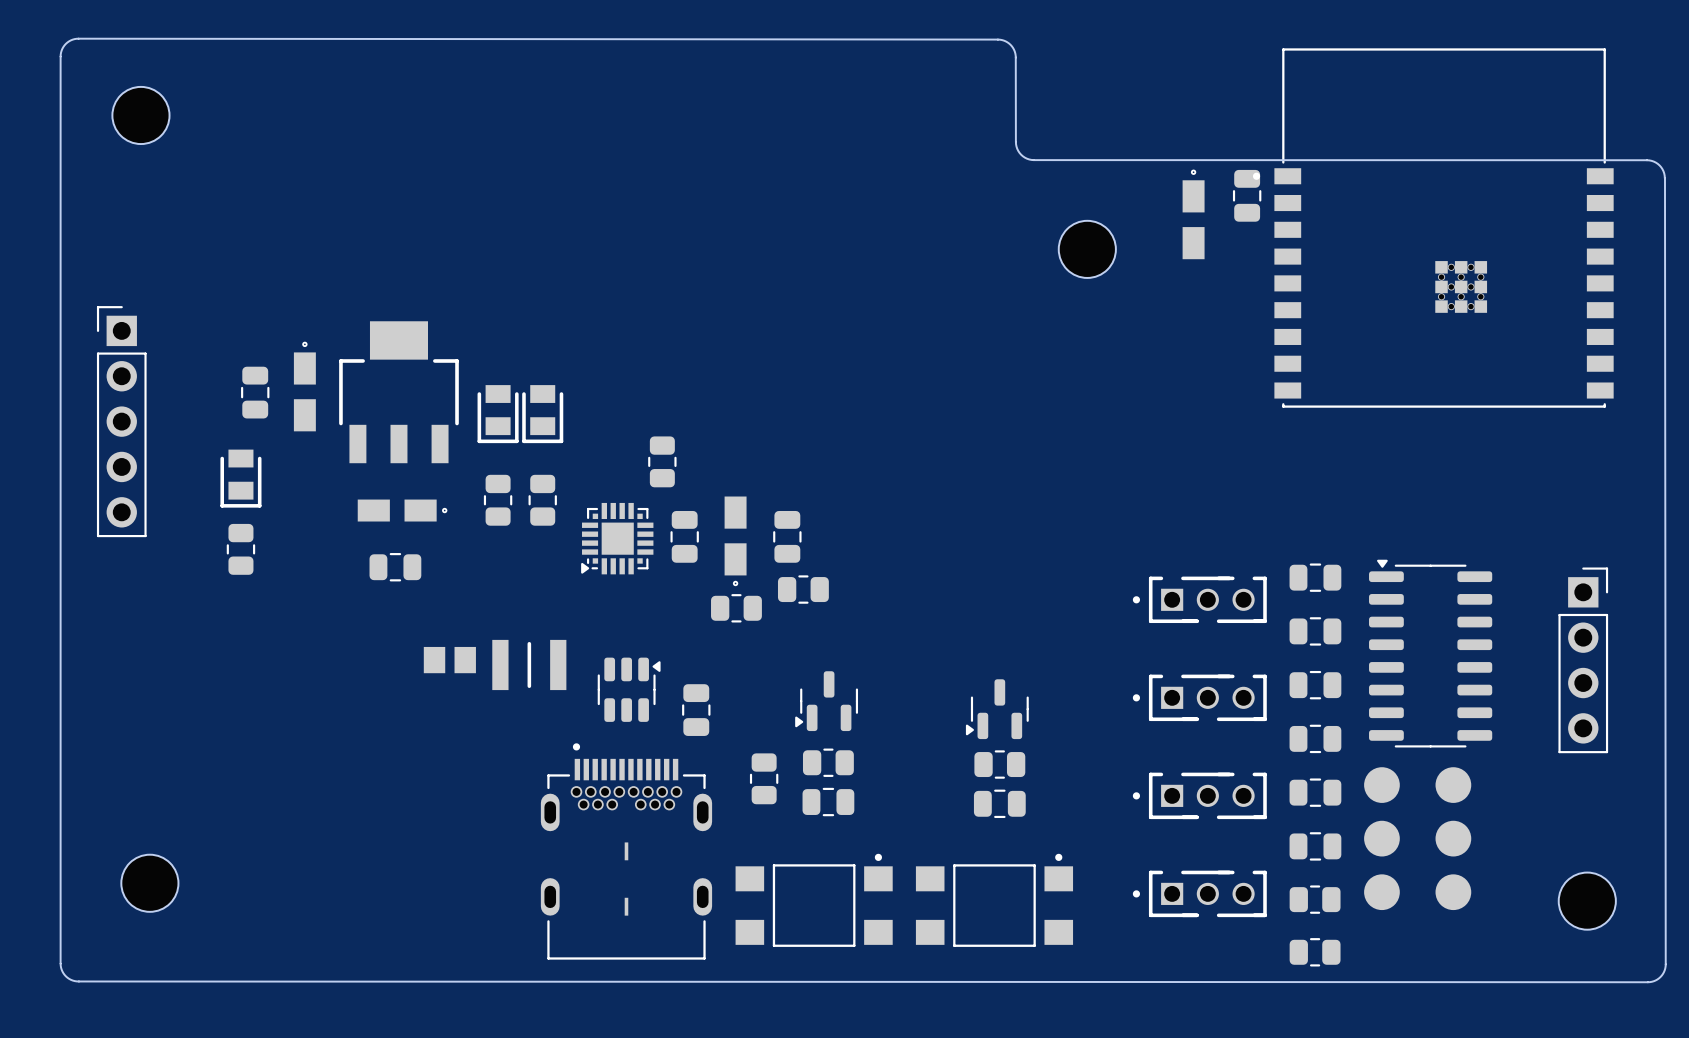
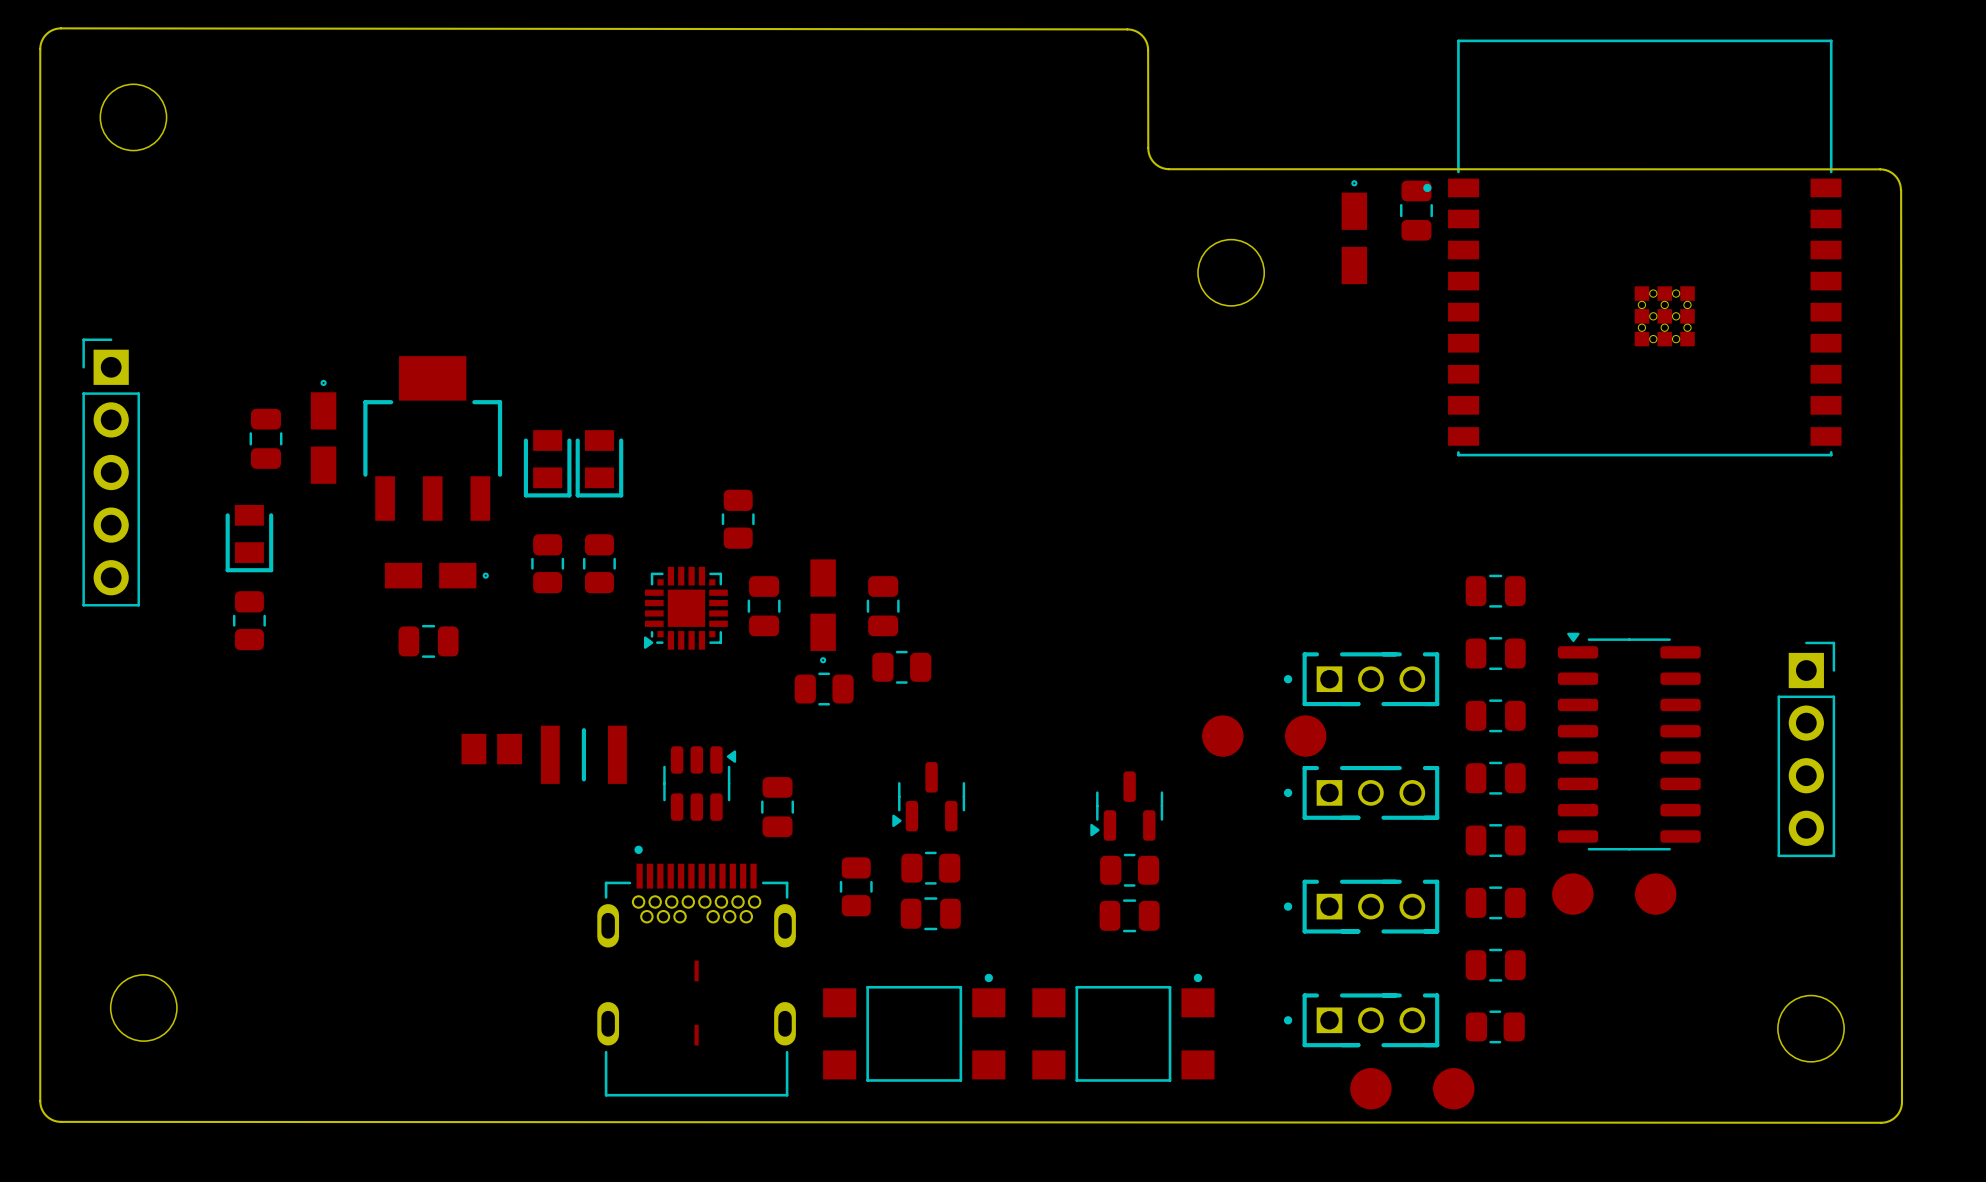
part: none -> (1495, 591)
part: none -> (1264, 736)
part: (1417, 838) -> none
part: (1417, 892) -> none
part: none -> (1412, 1088)
part: (1315, 952) -> none

